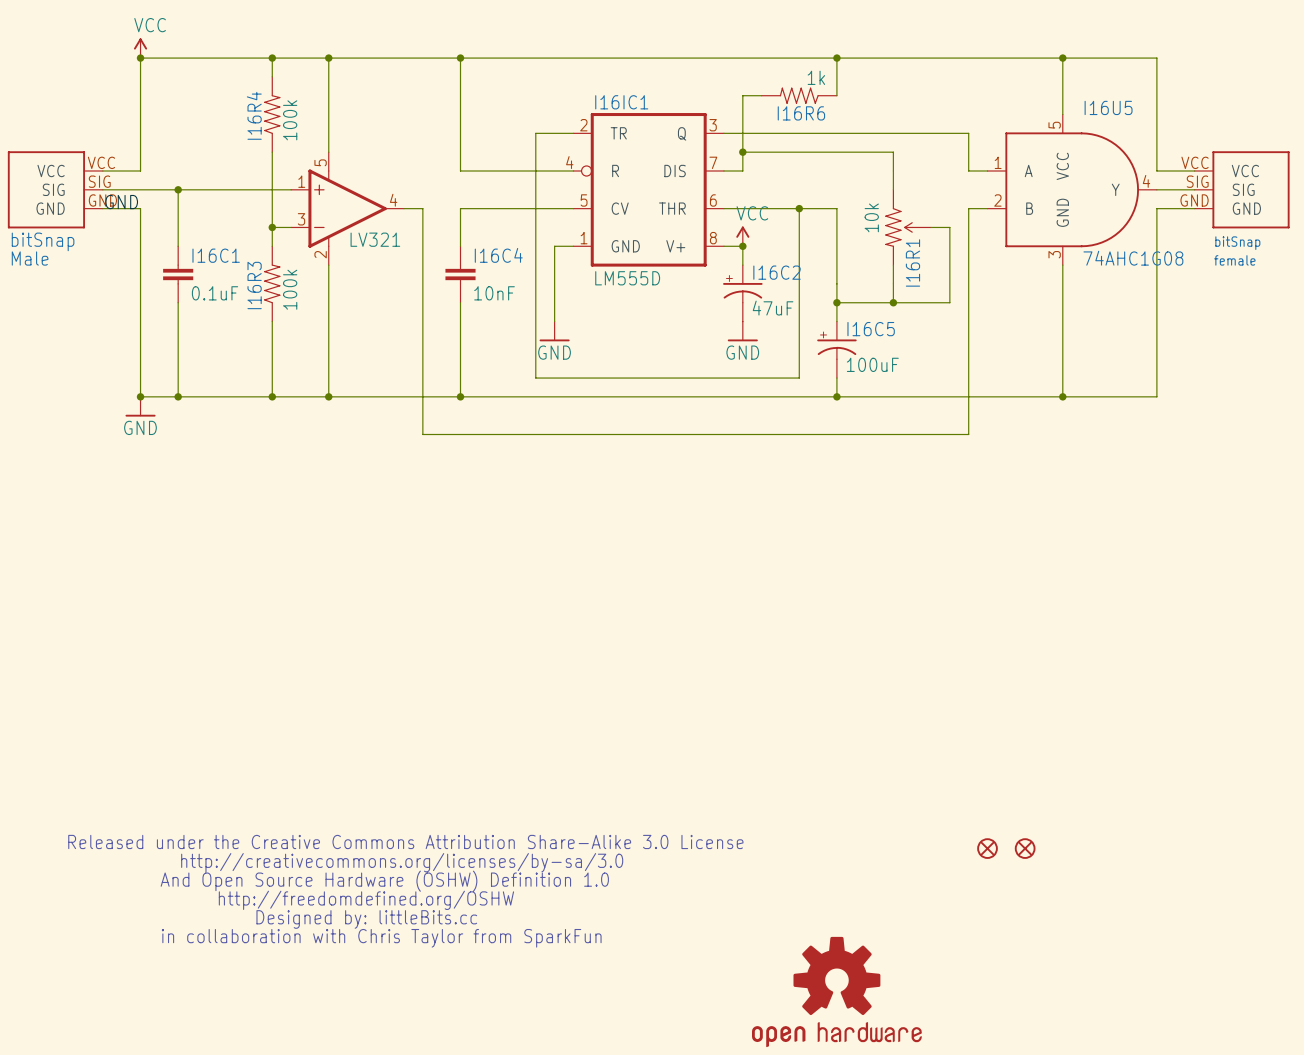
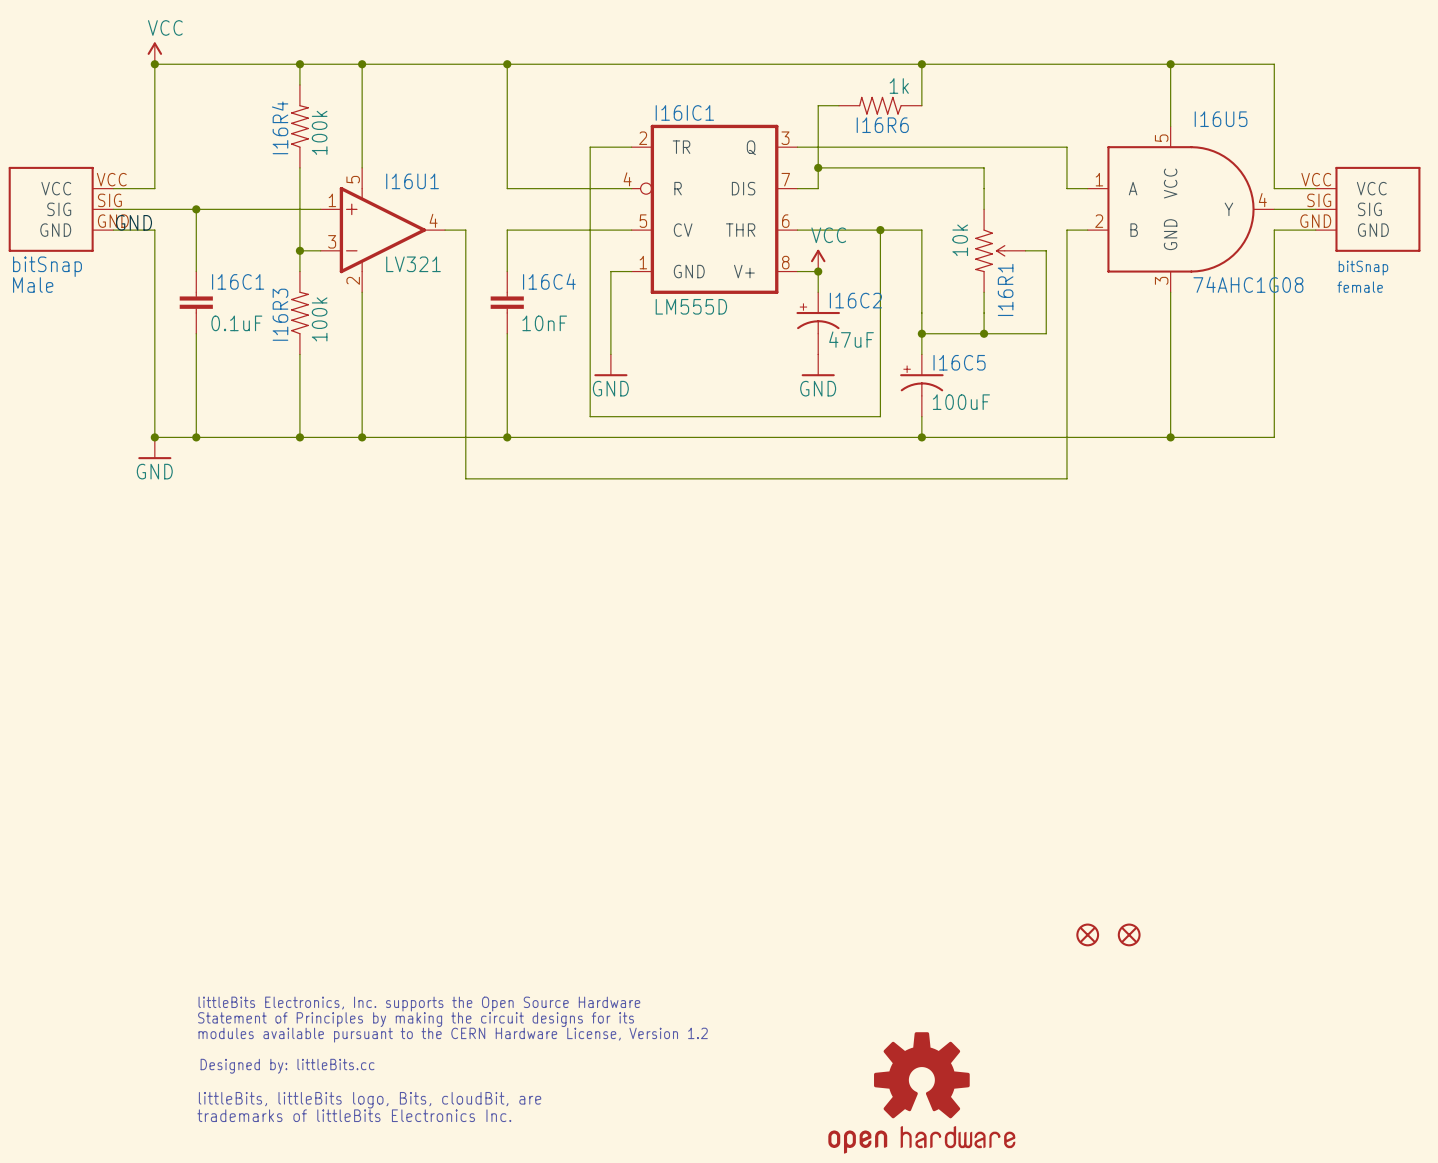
I16U1 name: none -> I16U1 (412, 181)
part: (405, 891) -> none
part: none -> (452, 1059)

